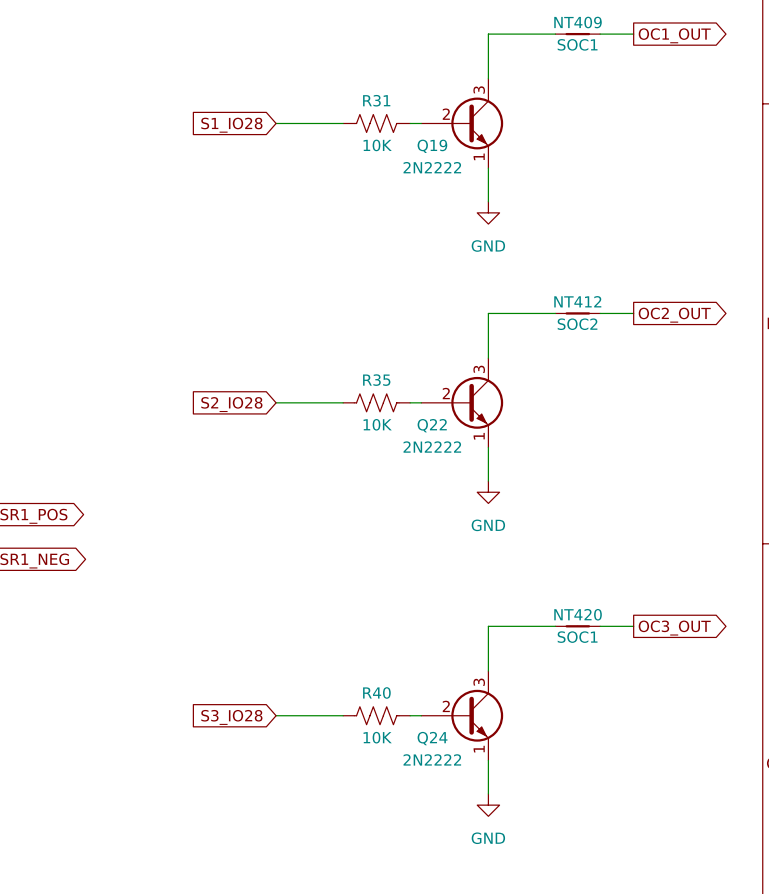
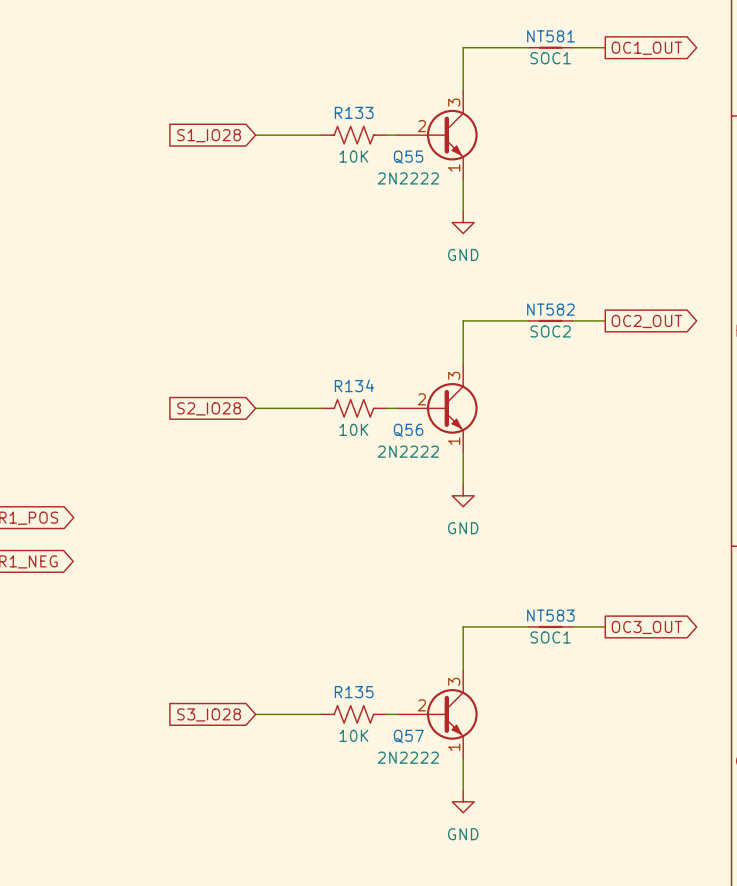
NT409 name: NT409 (578, 22) -> NT581 (550, 36)
R31 name: R31 (376, 100) -> R133 (354, 112)
Q19 name: Q19 (432, 146) -> Q55 (408, 157)
NT412 name: NT412 (577, 301) -> NT582 (550, 309)
R35 name: R35 (376, 380) -> R134 (354, 385)
Q22 name: Q22 (432, 425) -> Q56 (408, 430)
NT420 name: NT420 (578, 614) -> NT583 (550, 615)
R40 name: R40 (376, 692) -> R135 (354, 692)
Q24 name: Q24 (432, 738) -> Q57 (408, 736)

